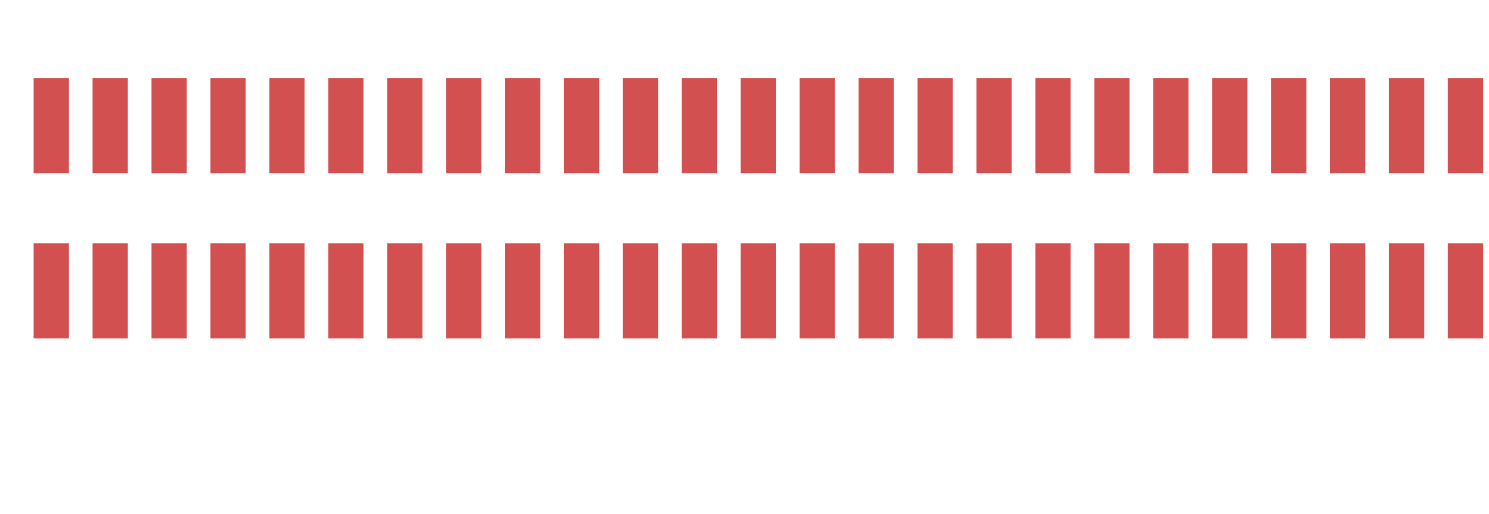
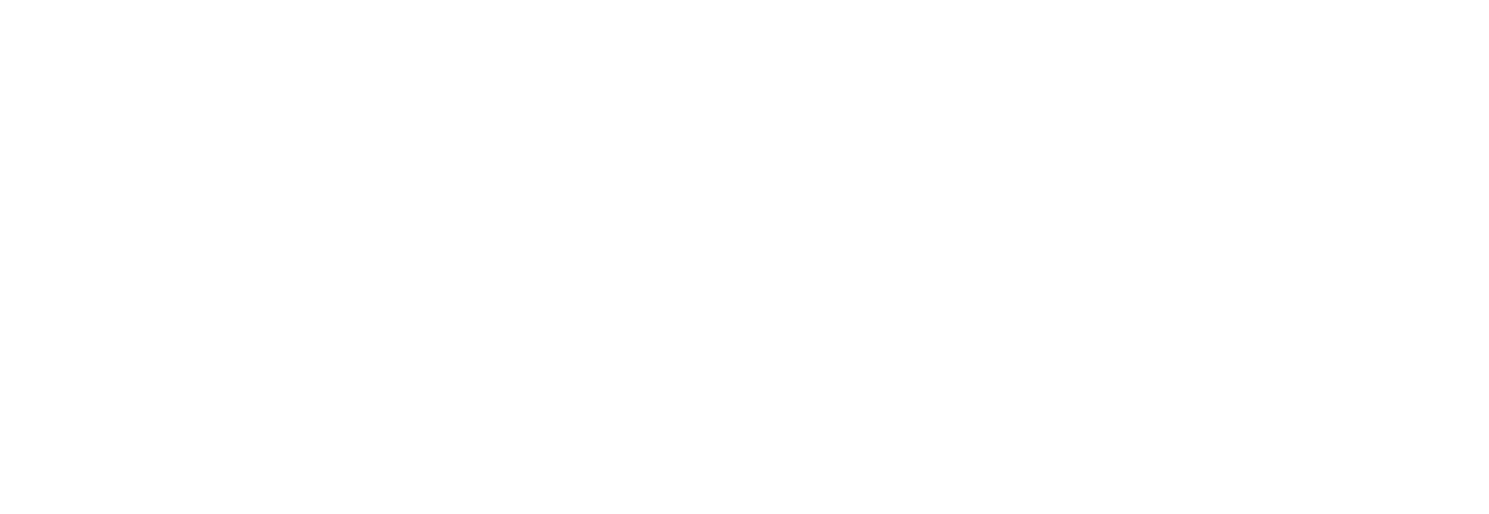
part: (758, 208) -> none

